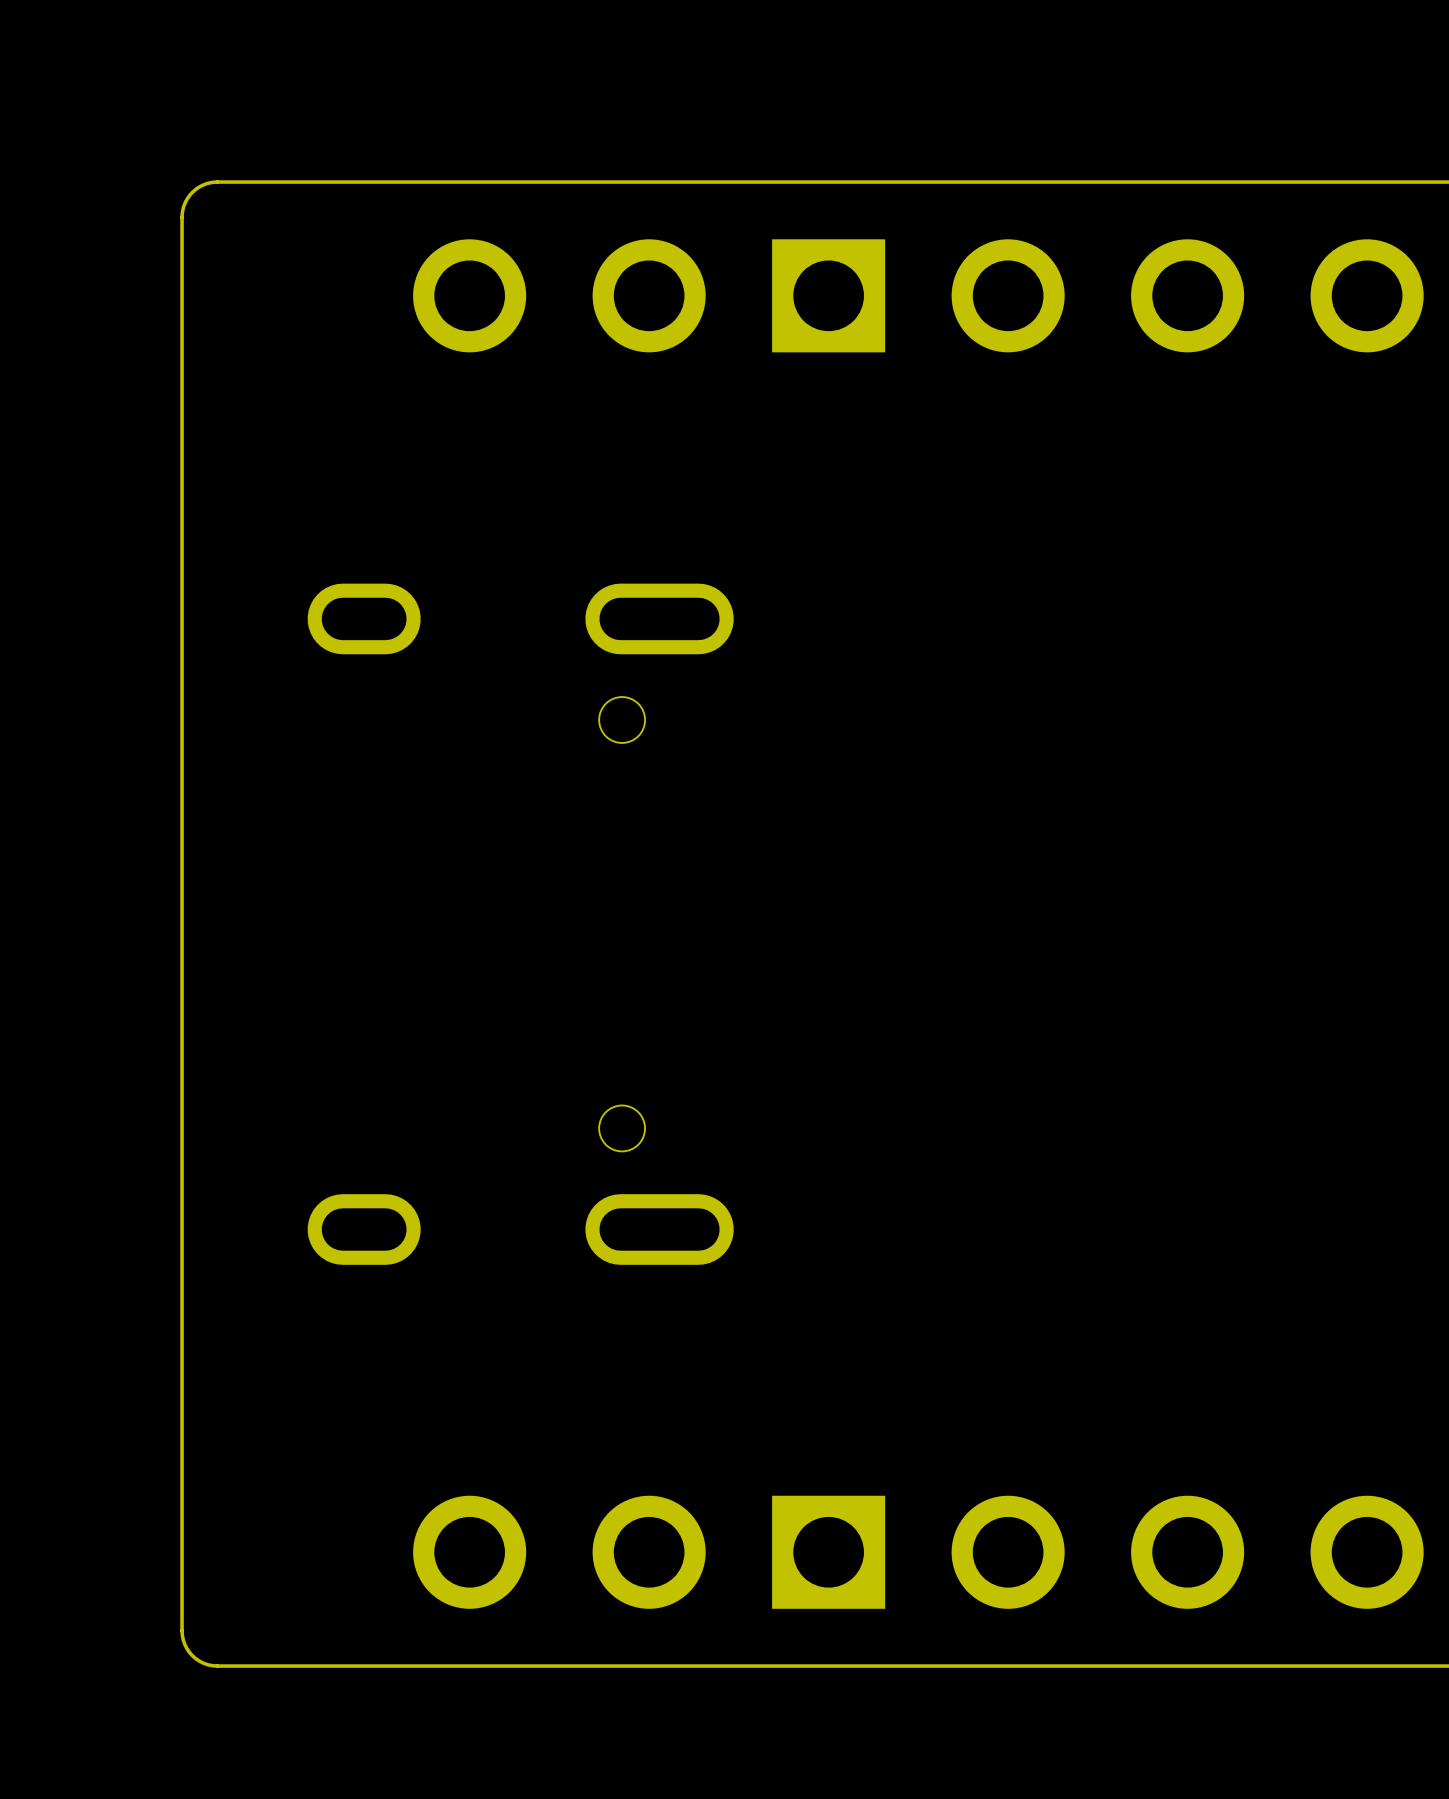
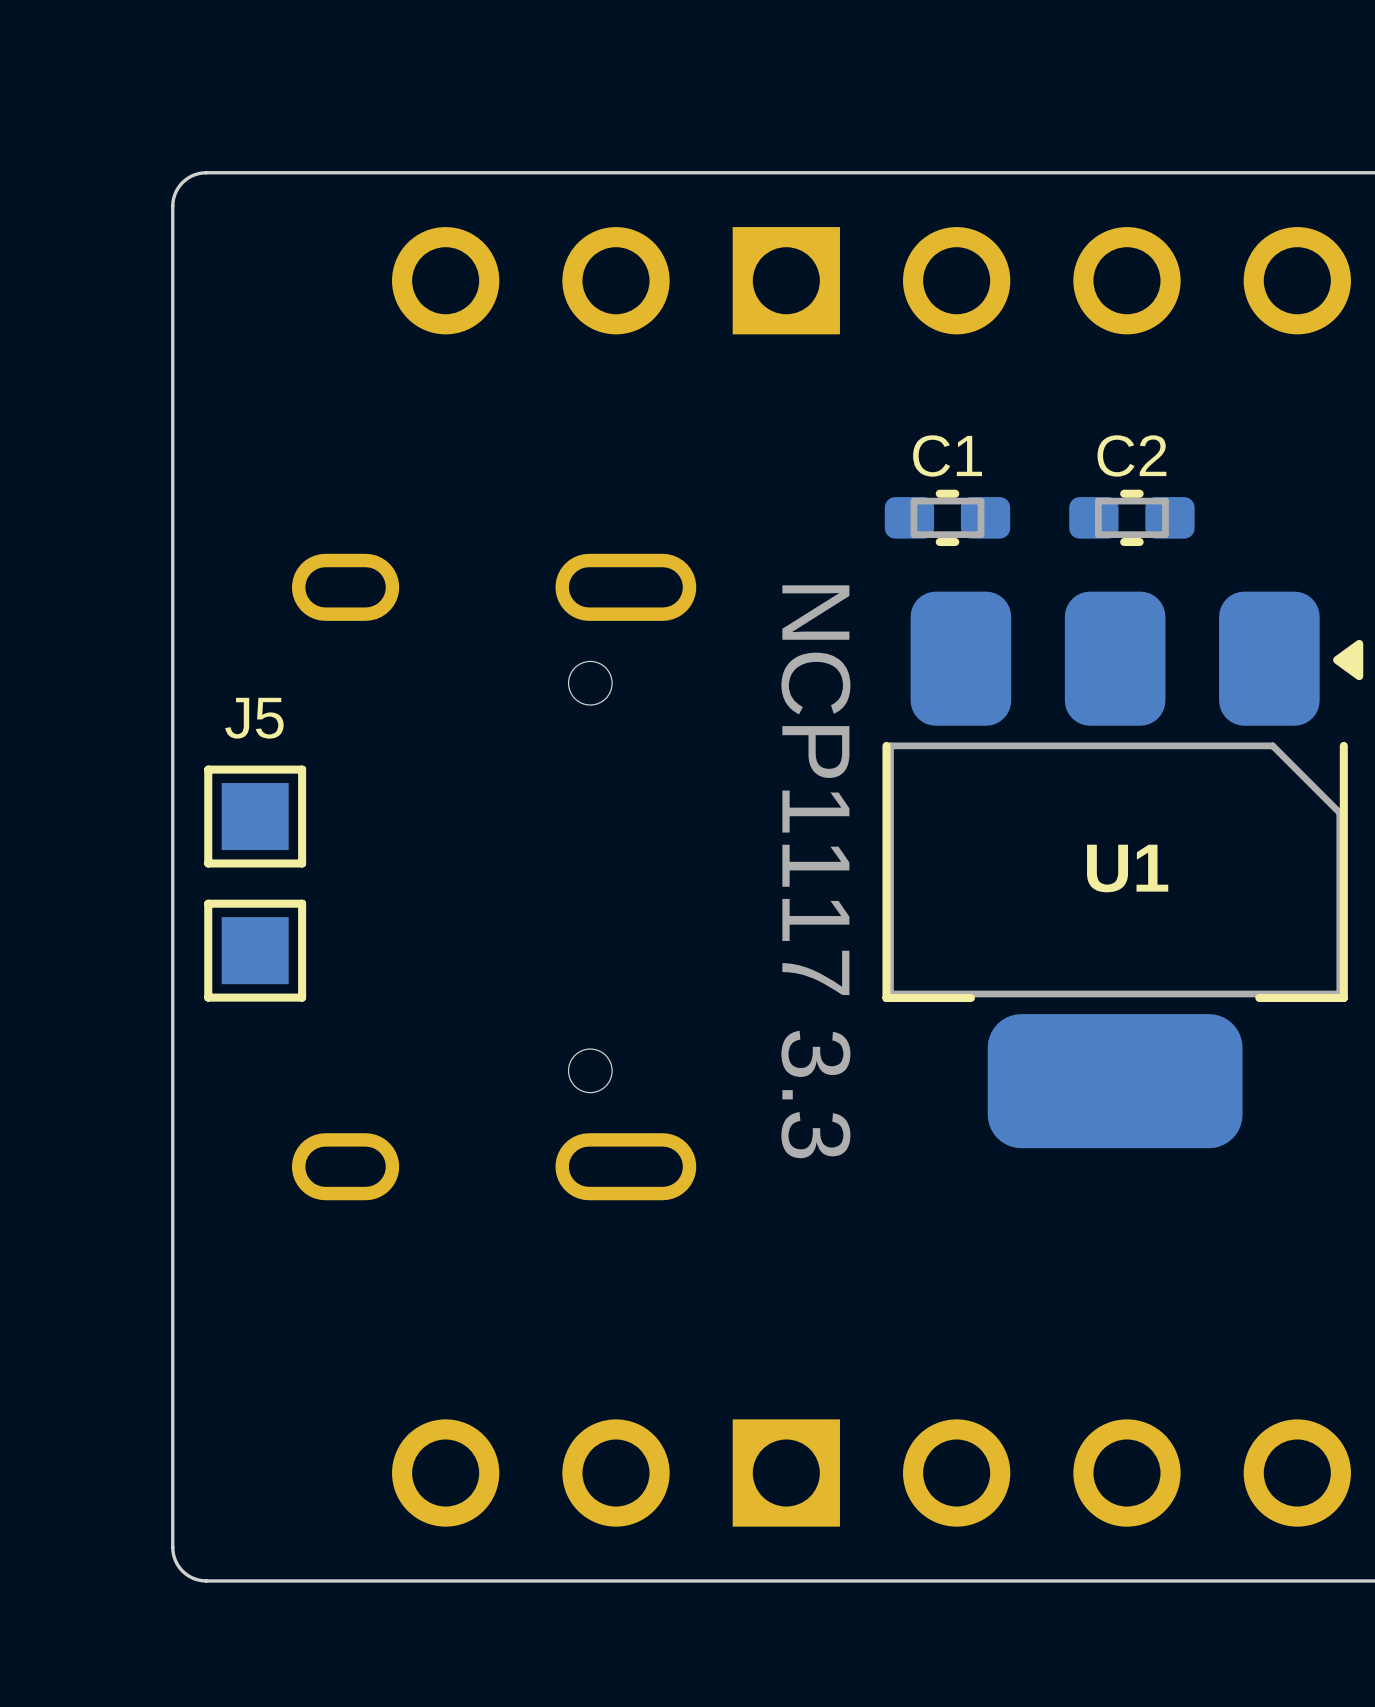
C1: none -> (947, 517)
C2: none -> (1131, 517)
U1: none -> NCP1117 3.3 (1122, 869)
J5: none -> (255, 883)

